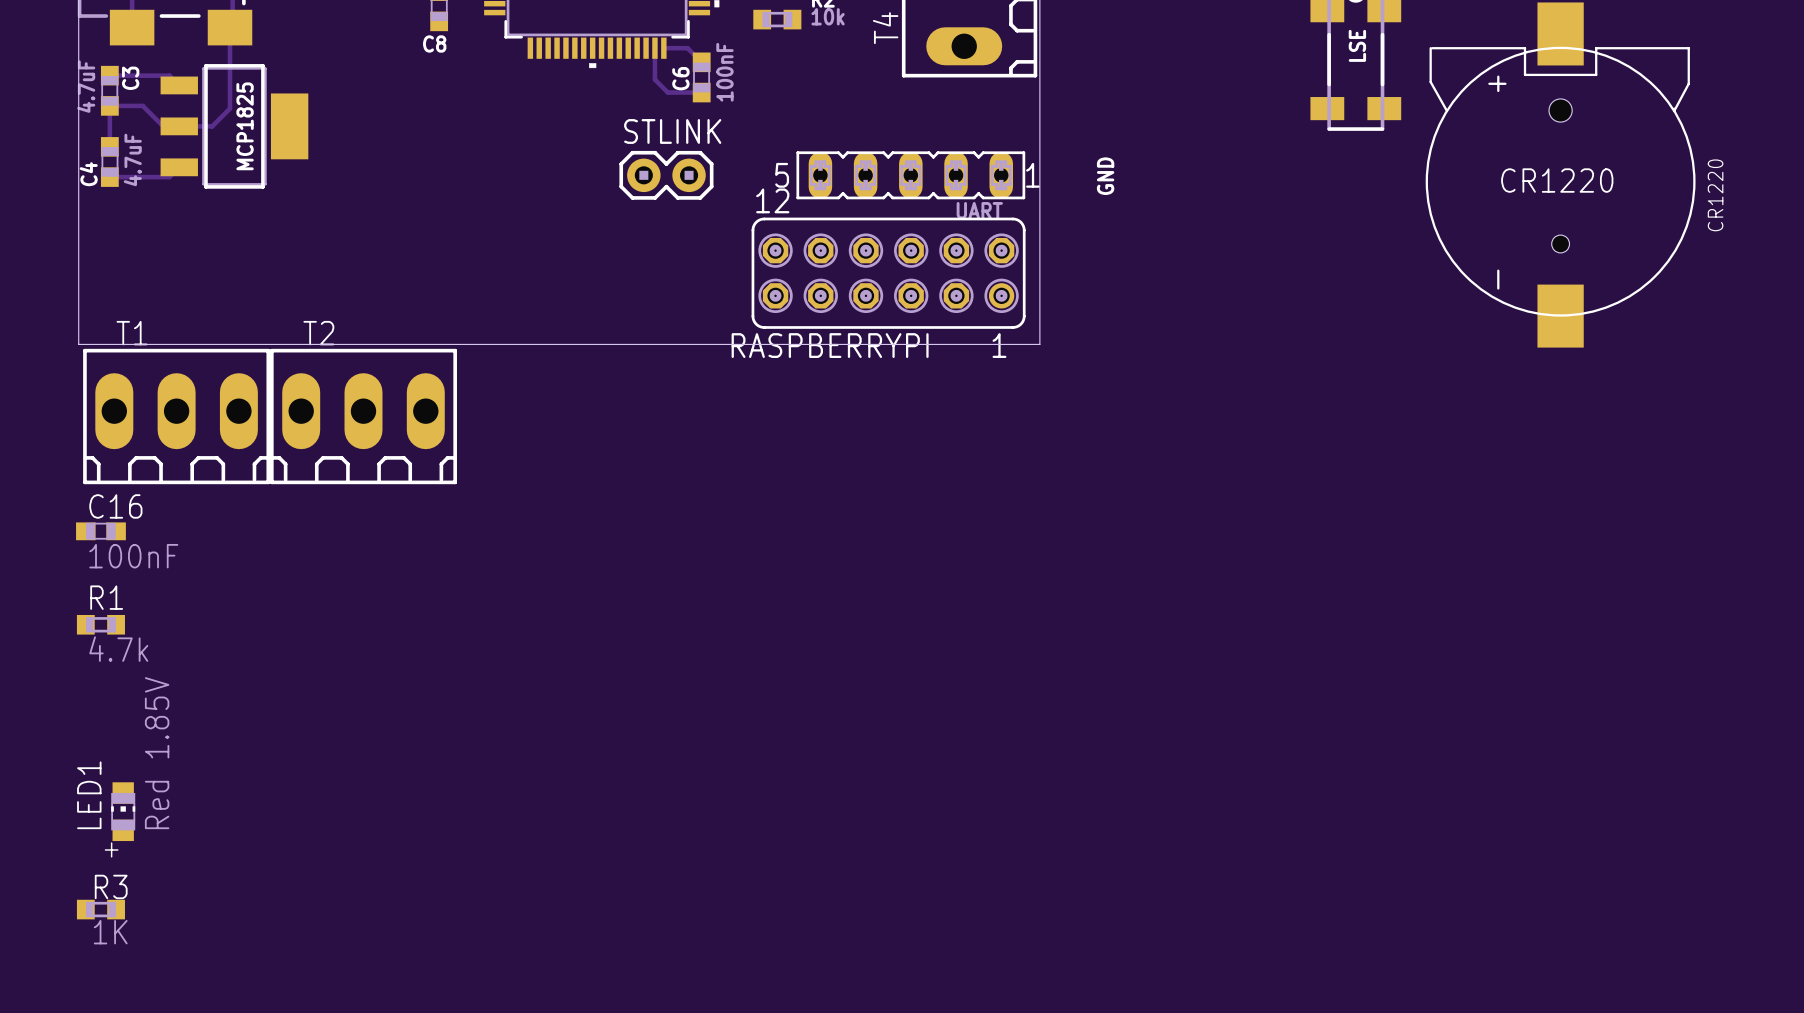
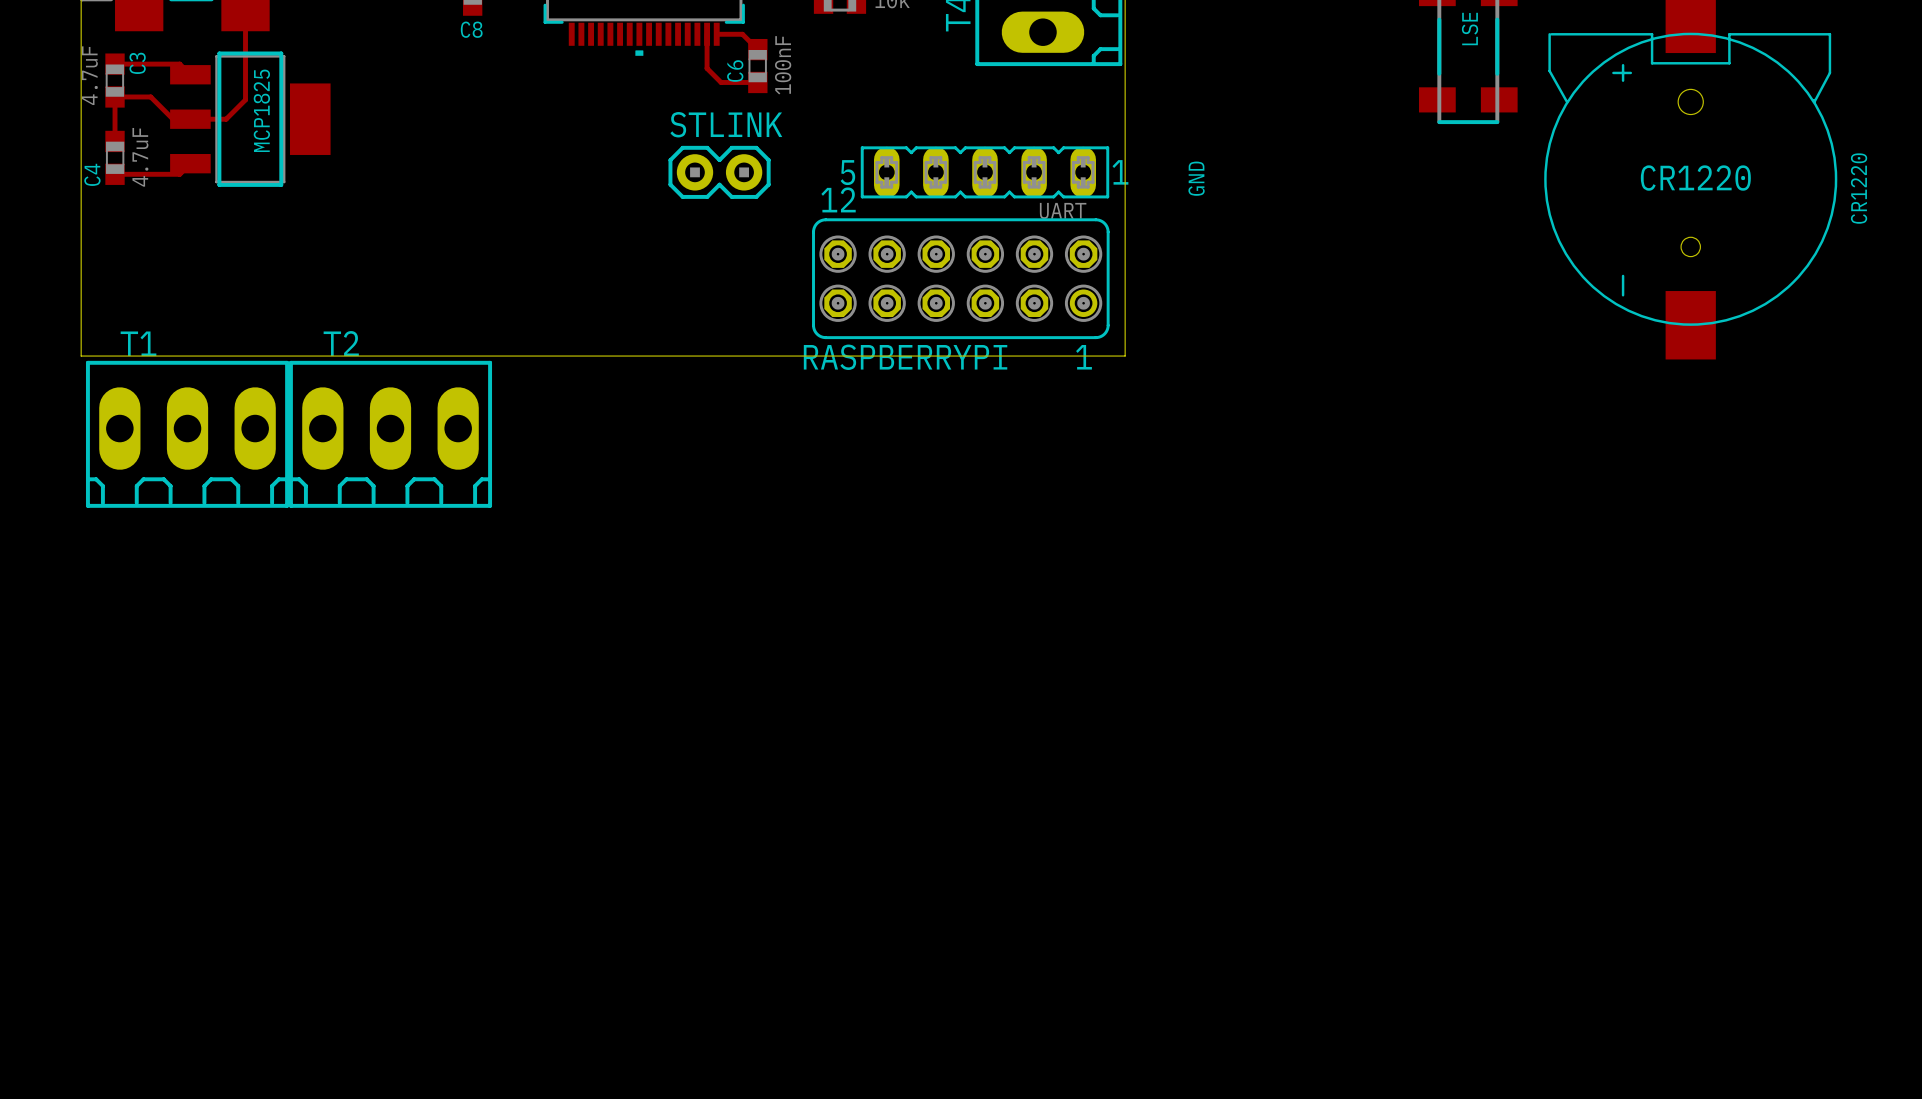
C16: 100nF (100, 531) -> none
R1: 4.7k (100, 624) -> none
LED1: Red 1.85V (123, 811) -> none
R3: 1K (100, 909) -> none

